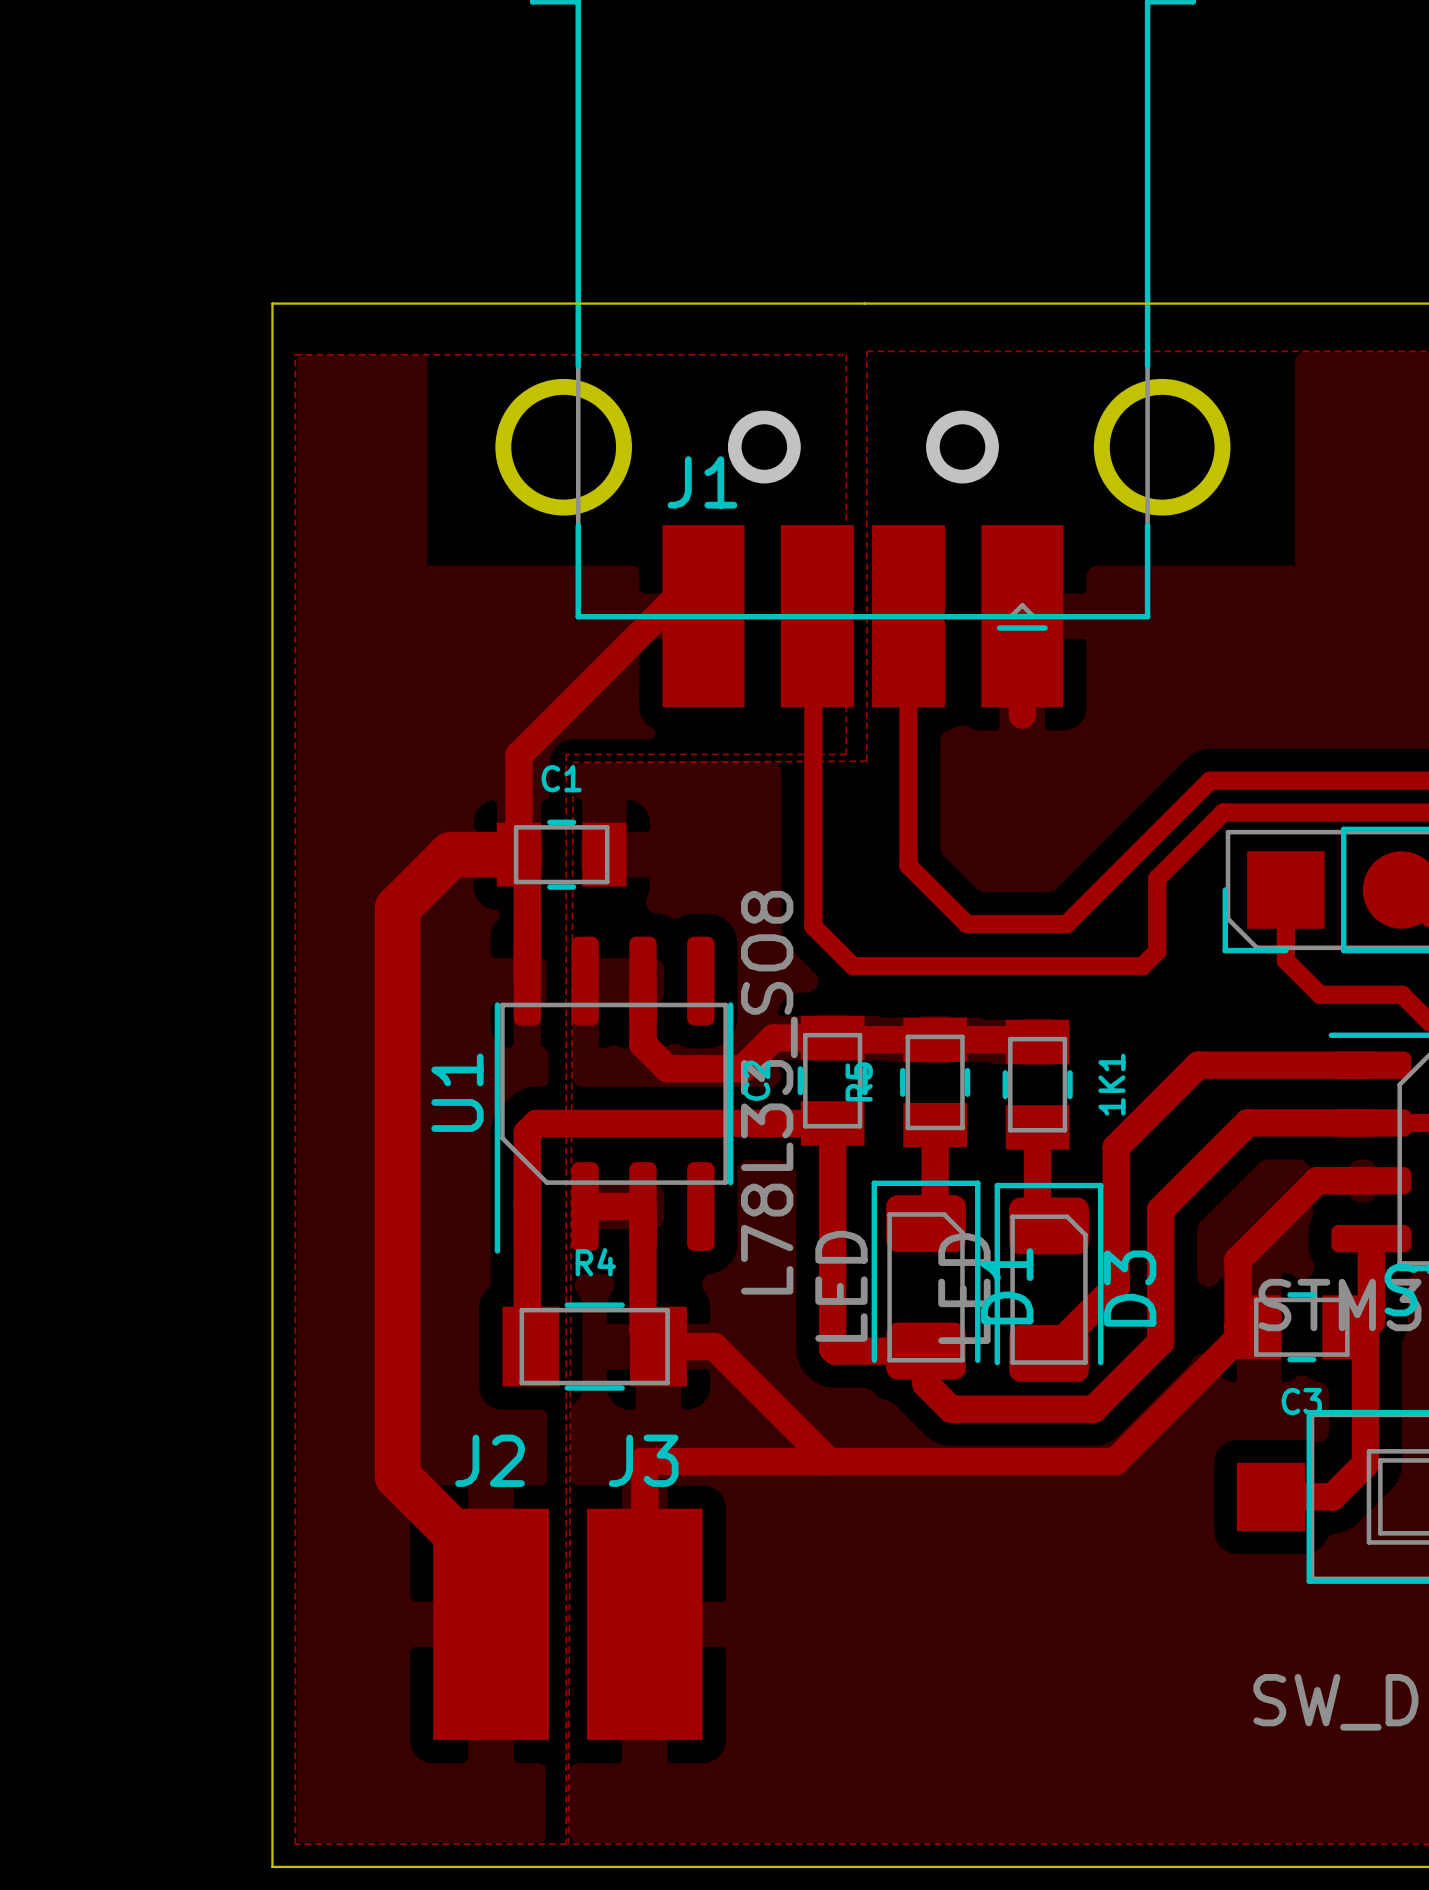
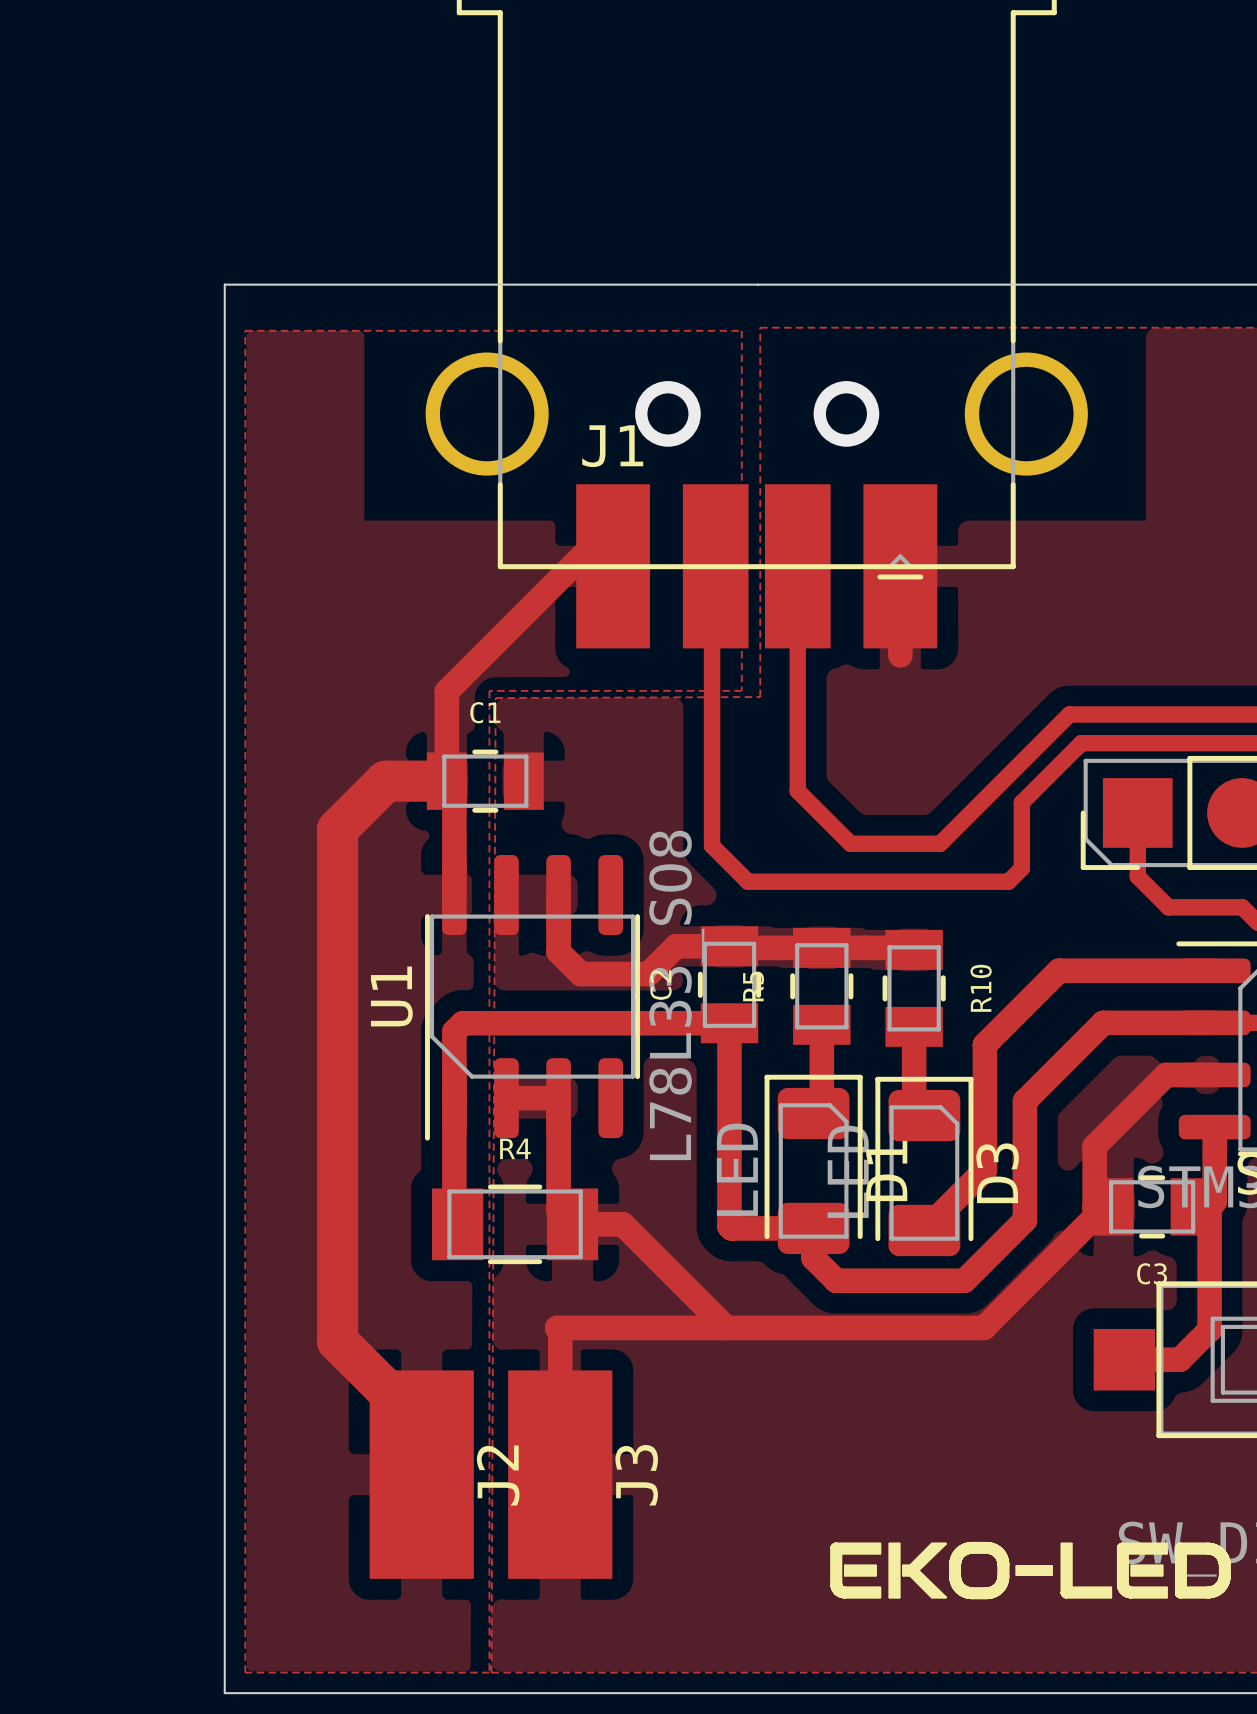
1K1 name: 1K1 (1111, 1084) -> R10 (981, 988)
J2 name rotation: 0° (489, 1460) -> 90° counterclockwise (498, 1475)
J2 name position: J2 (489, 1460) -> J2 (498, 1475)
J3 name rotation: 0° (643, 1460) -> 90° counterclockwise (636, 1475)
J3 name position: J3 (643, 1460) -> J3 (636, 1475)
drawing: none -> [830, 1541, 1231, 1600]

